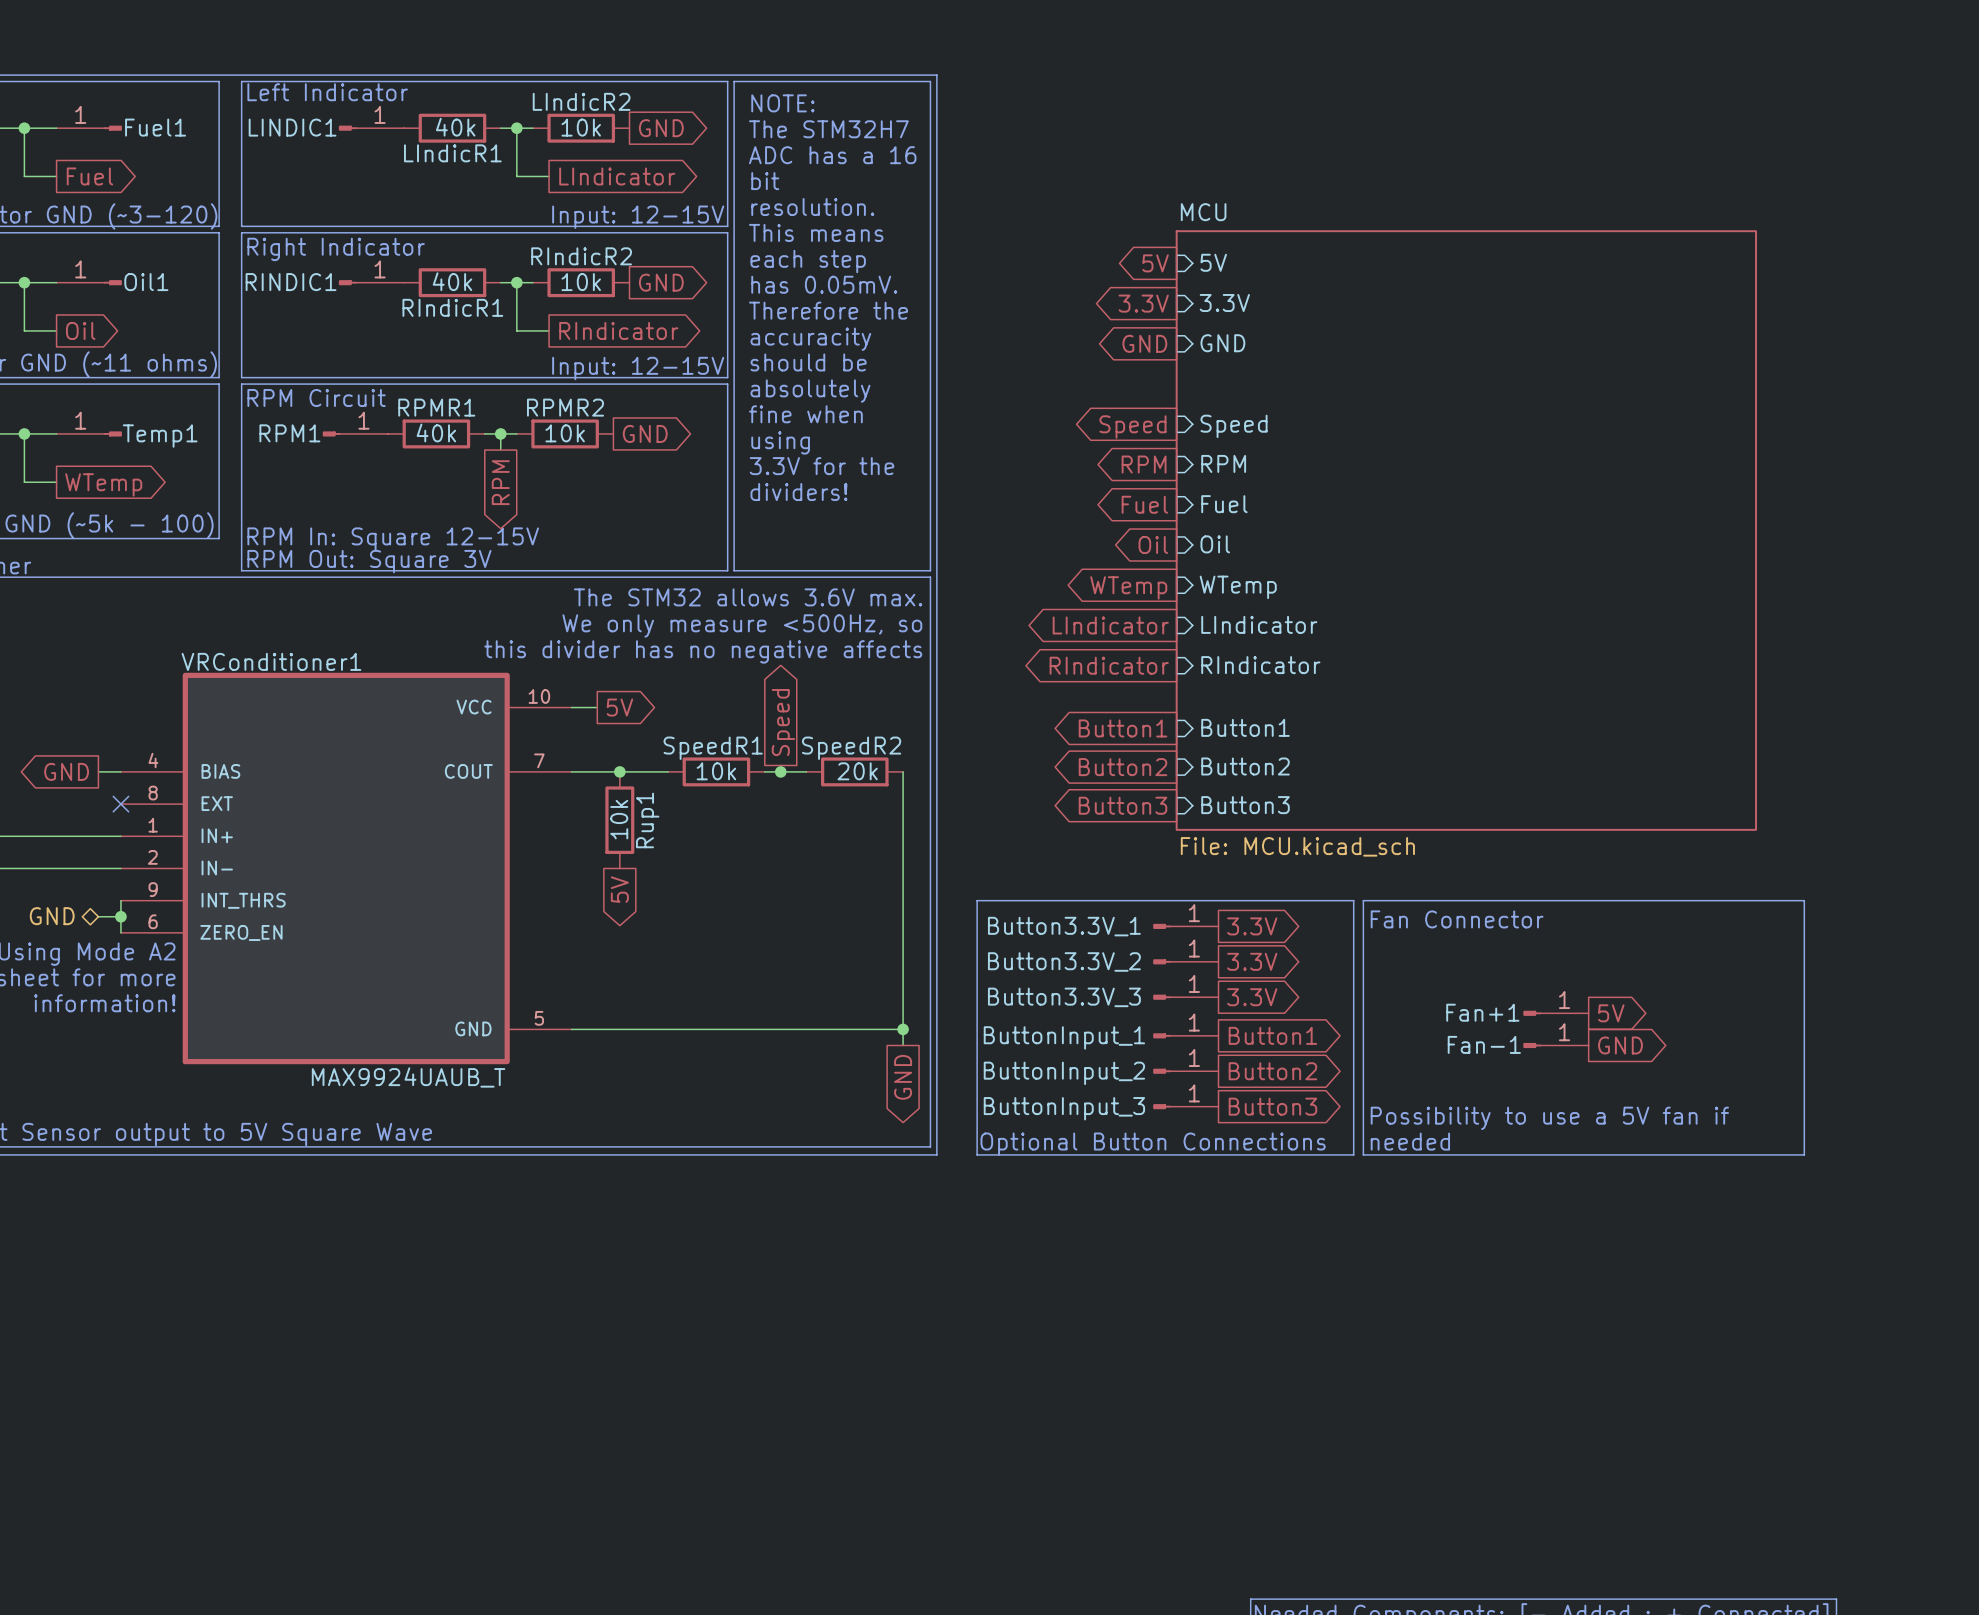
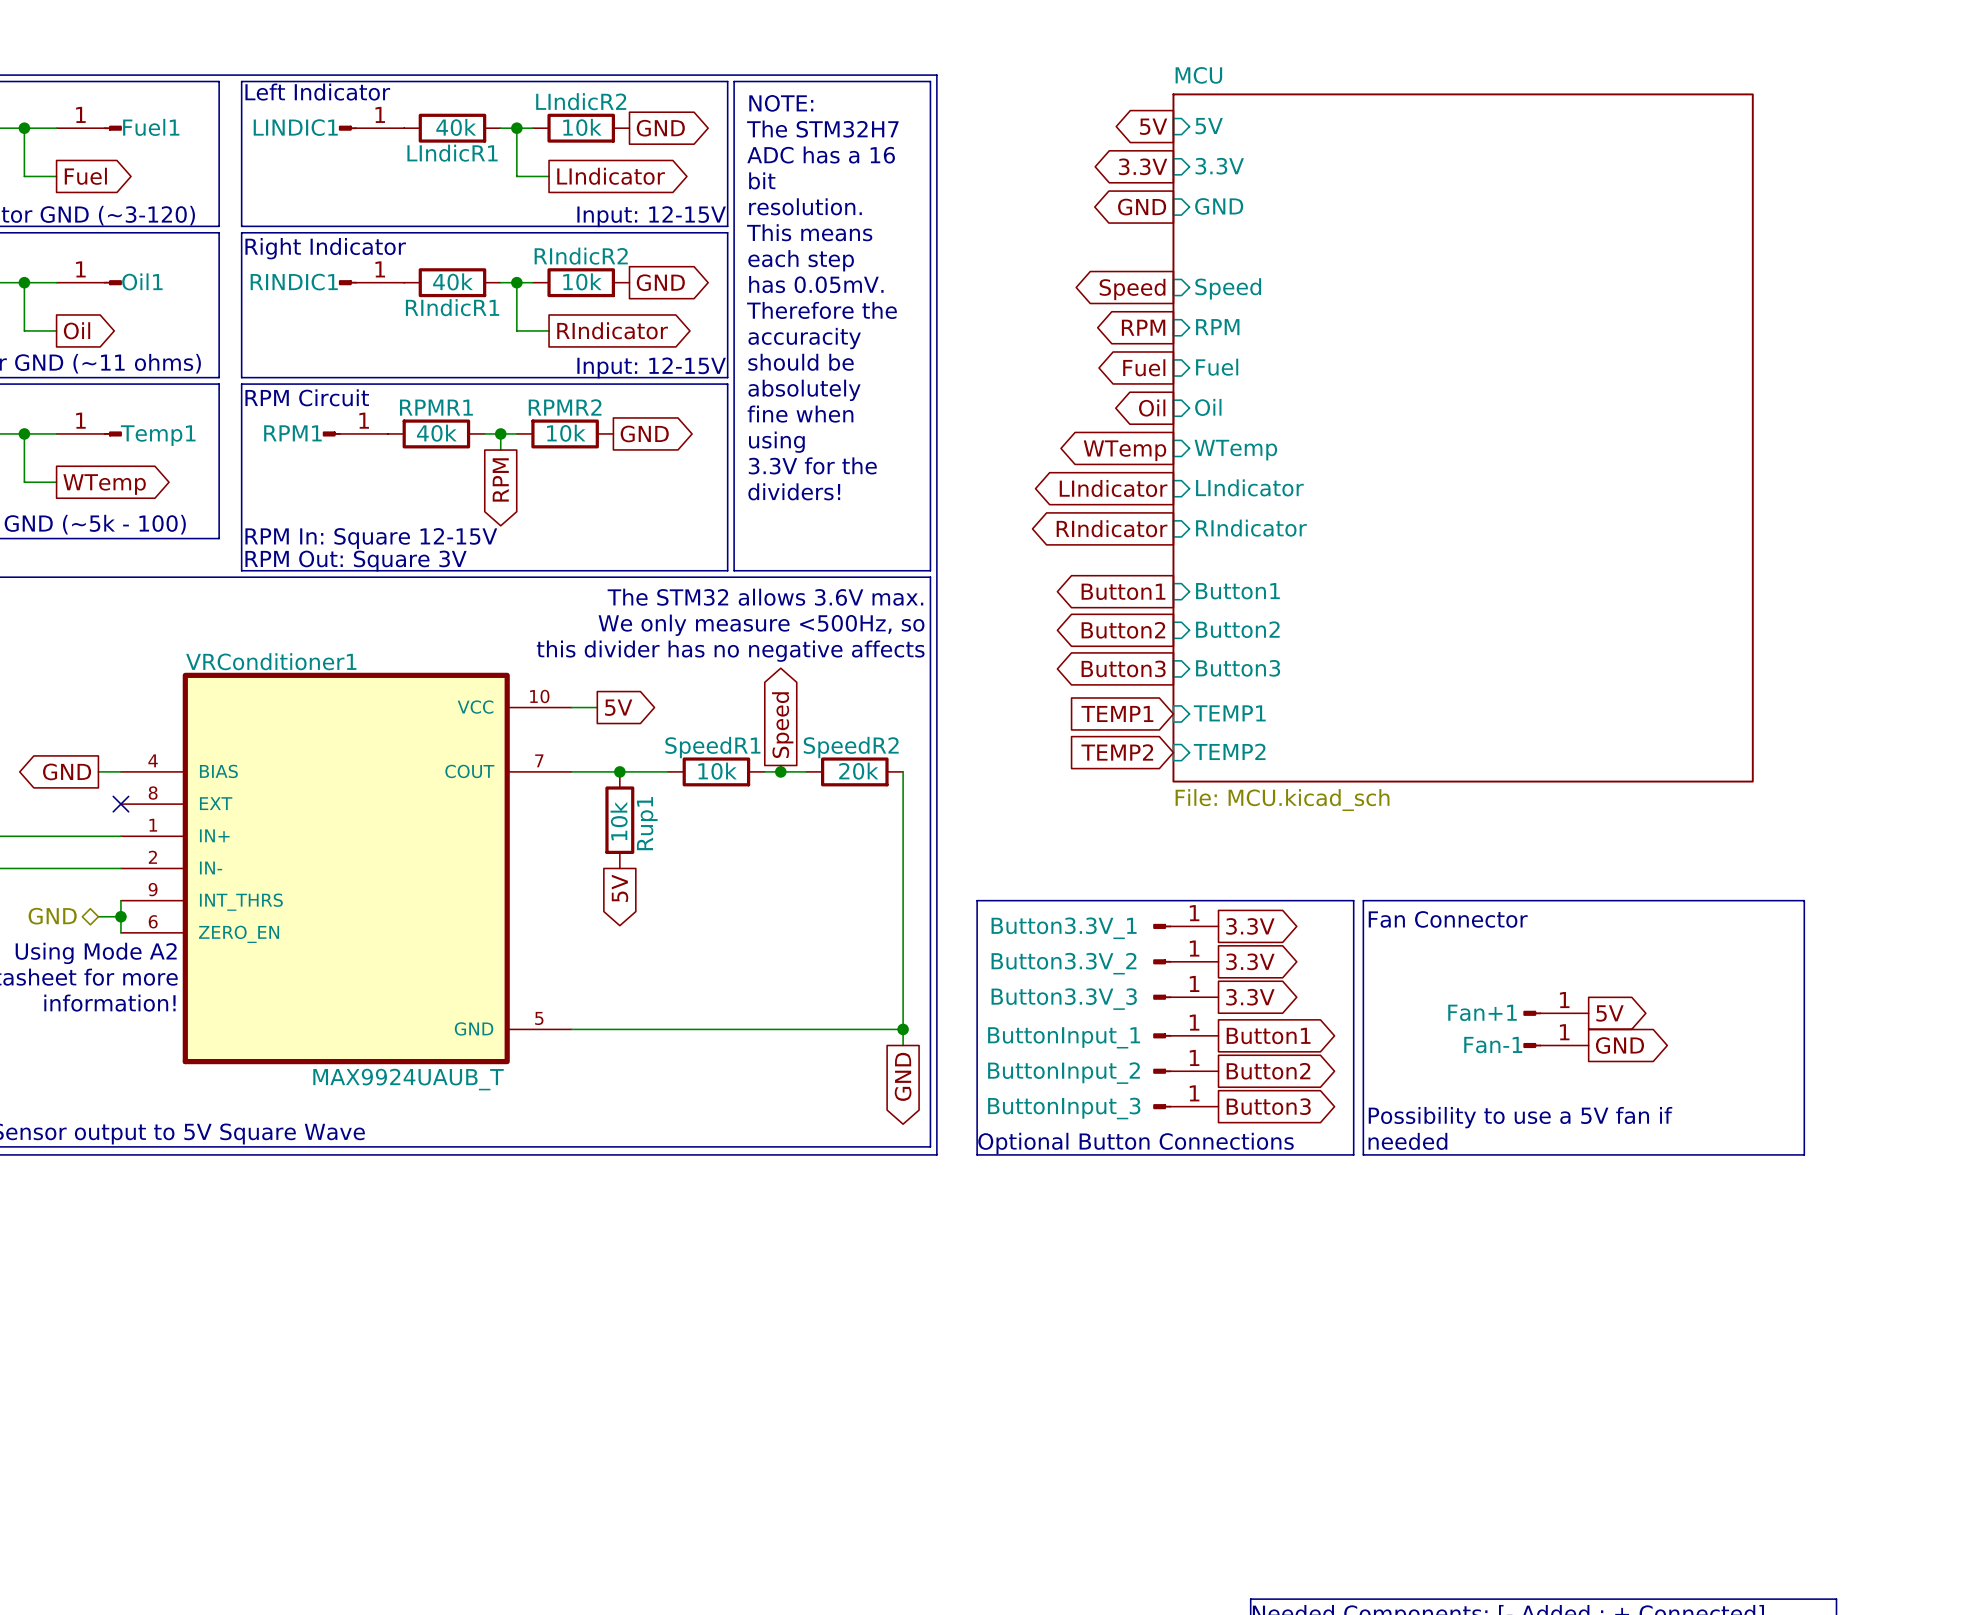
sheet pin position: 5V (1213, 262) -> 5V (1209, 126)
global label position: 5V (1155, 263) -> 5V (1153, 126)
global label position: 3.3V (1143, 303) -> 3.3V (1143, 166)
sheet pin position: 3.3V (1224, 303) -> 3.3V (1219, 166)
global label position: GND (1144, 343) -> GND (1142, 207)
sheet pin position: GND (1222, 343) -> GND (1219, 206)
global label position: Speed (1132, 426) -> Speed (1132, 289)
sheet pin position: Speed (1234, 426) -> Speed (1228, 288)
sheet MCU: none -> File: MCU.kicad_sch (1463, 437)
sheet pin position: RPM (1223, 463) -> RPM (1217, 327)
global label position: RPM (1144, 464) -> RPM (1143, 327)
global label position: Fuel (1144, 504) -> Fuel (1144, 367)
sheet pin position: Fuel (1224, 504) -> Fuel (1217, 367)
sheet MCU: File: MCU.kicad_sch (1466, 530) -> none
sheet pin position: Oil (1215, 544) -> Oil (1208, 407)
global label position: Oil (1153, 545) -> Oil (1152, 408)
global label position: WTemp (1128, 587) -> WTemp (1124, 450)
sheet pin position: WTemp (1238, 587) -> WTemp (1235, 450)
sheet pin position: LIndicator (1259, 624) -> LIndicator (1249, 487)
global label position: LIndicator (1110, 625) -> LIndicator (1113, 488)
global label position: RIndicator (1109, 665) -> RIndicator (1112, 528)
sheet pin position: RIndicator (1260, 665) -> RIndicator (1251, 528)
global label: none -> TEMP1 (1117, 713)
sheet pin: none -> TEMP1 (1229, 713)
sheet pin position: Button1 (1245, 727) -> Button1 (1237, 591)
global label position: Button1 (1123, 728) -> Button1 (1123, 591)
global label: none -> TEMP2 (1117, 752)
sheet pin: none -> TEMP2 (1229, 751)
sheet pin position: Button2 (1245, 766) -> Button2 (1237, 629)
global label position: Button2 (1123, 767) -> Button2 (1123, 630)
global label position: Button3 (1123, 805) -> Button3 (1123, 668)
sheet pin position: Button3 (1245, 805) -> Button3 (1238, 668)

